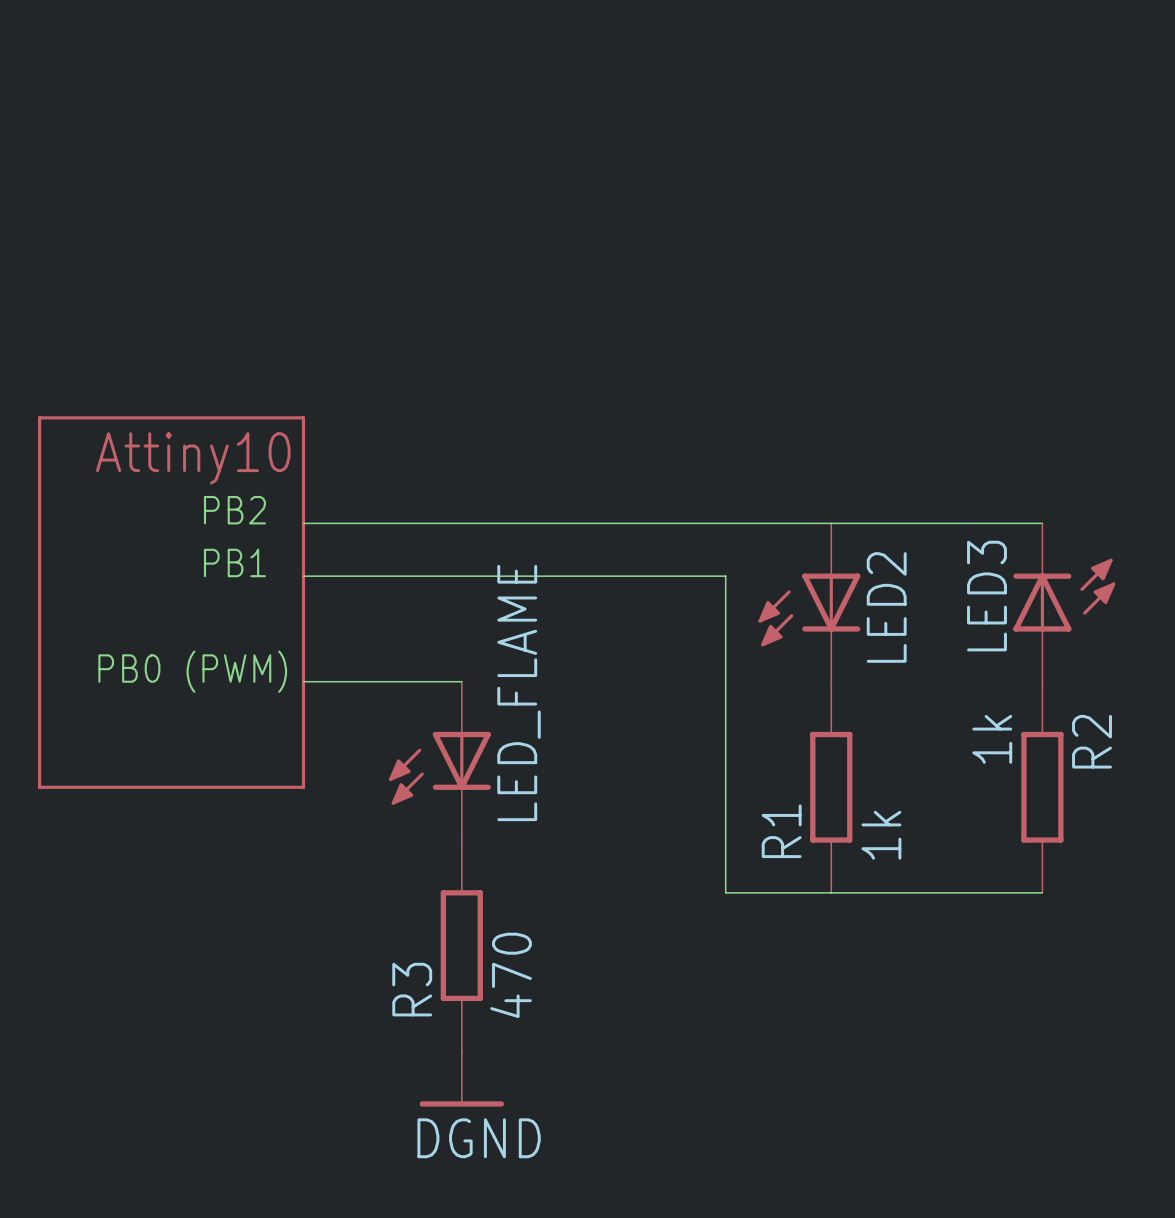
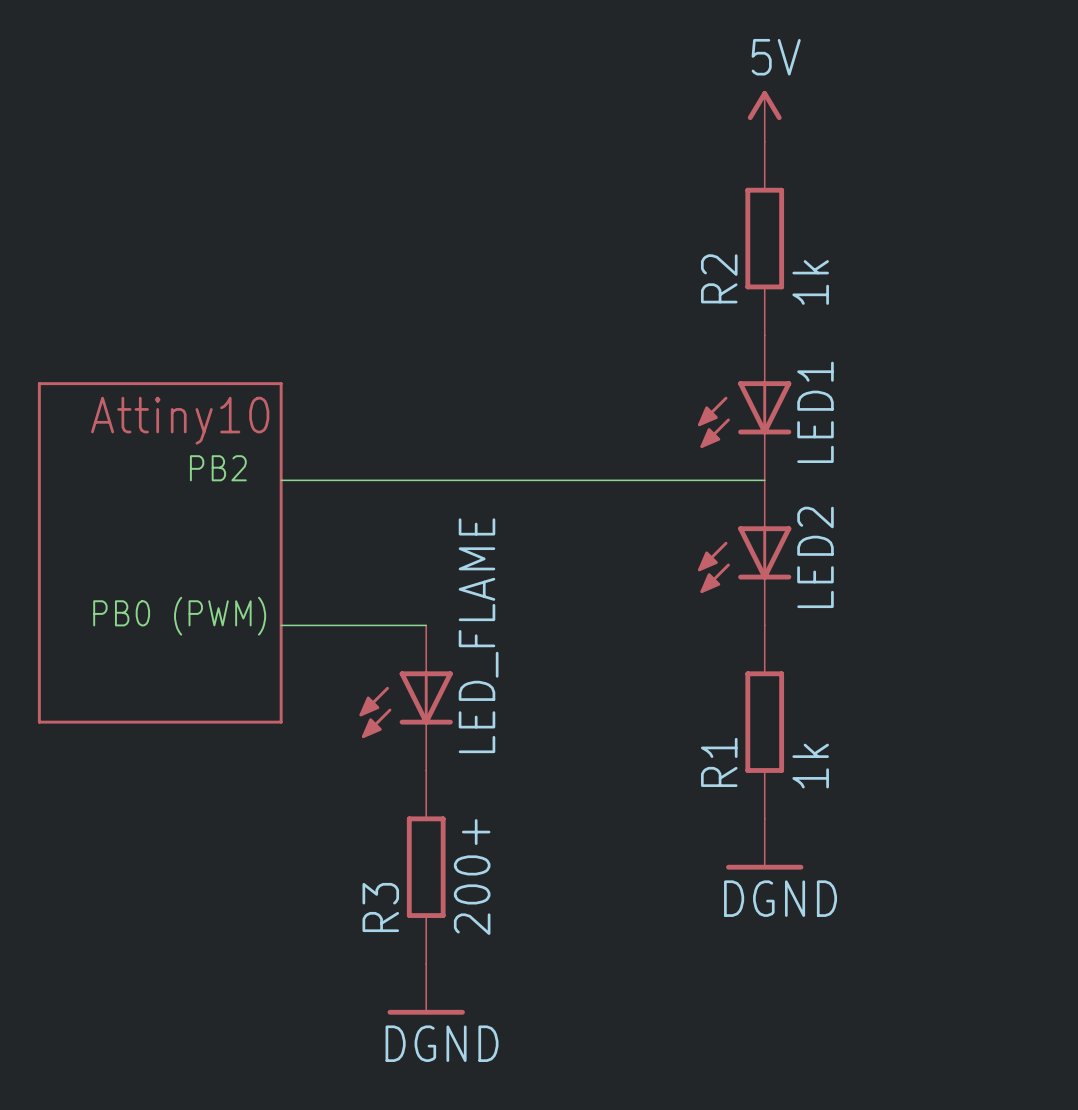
power symbol: none -> 5V (764, 116)
LED1: none -> (744, 407)
wire: (831, 523) (1042, 523) -> none
text: PB1 (234, 562) -> none
wire: (303, 576) (725, 576) (725, 892) (1042, 892) -> none
LED3: (1064, 602) -> none
R2 value position: 1k (992, 739) -> 1k (810, 282)
R2 name position: R2 (1092, 741) -> R2 (719, 278)
R2 position: (1042, 787) -> (764, 238)
power symbol: none -> DGND (764, 844)
R3 value: 470 (511, 975) -> 200+ (472, 877)

